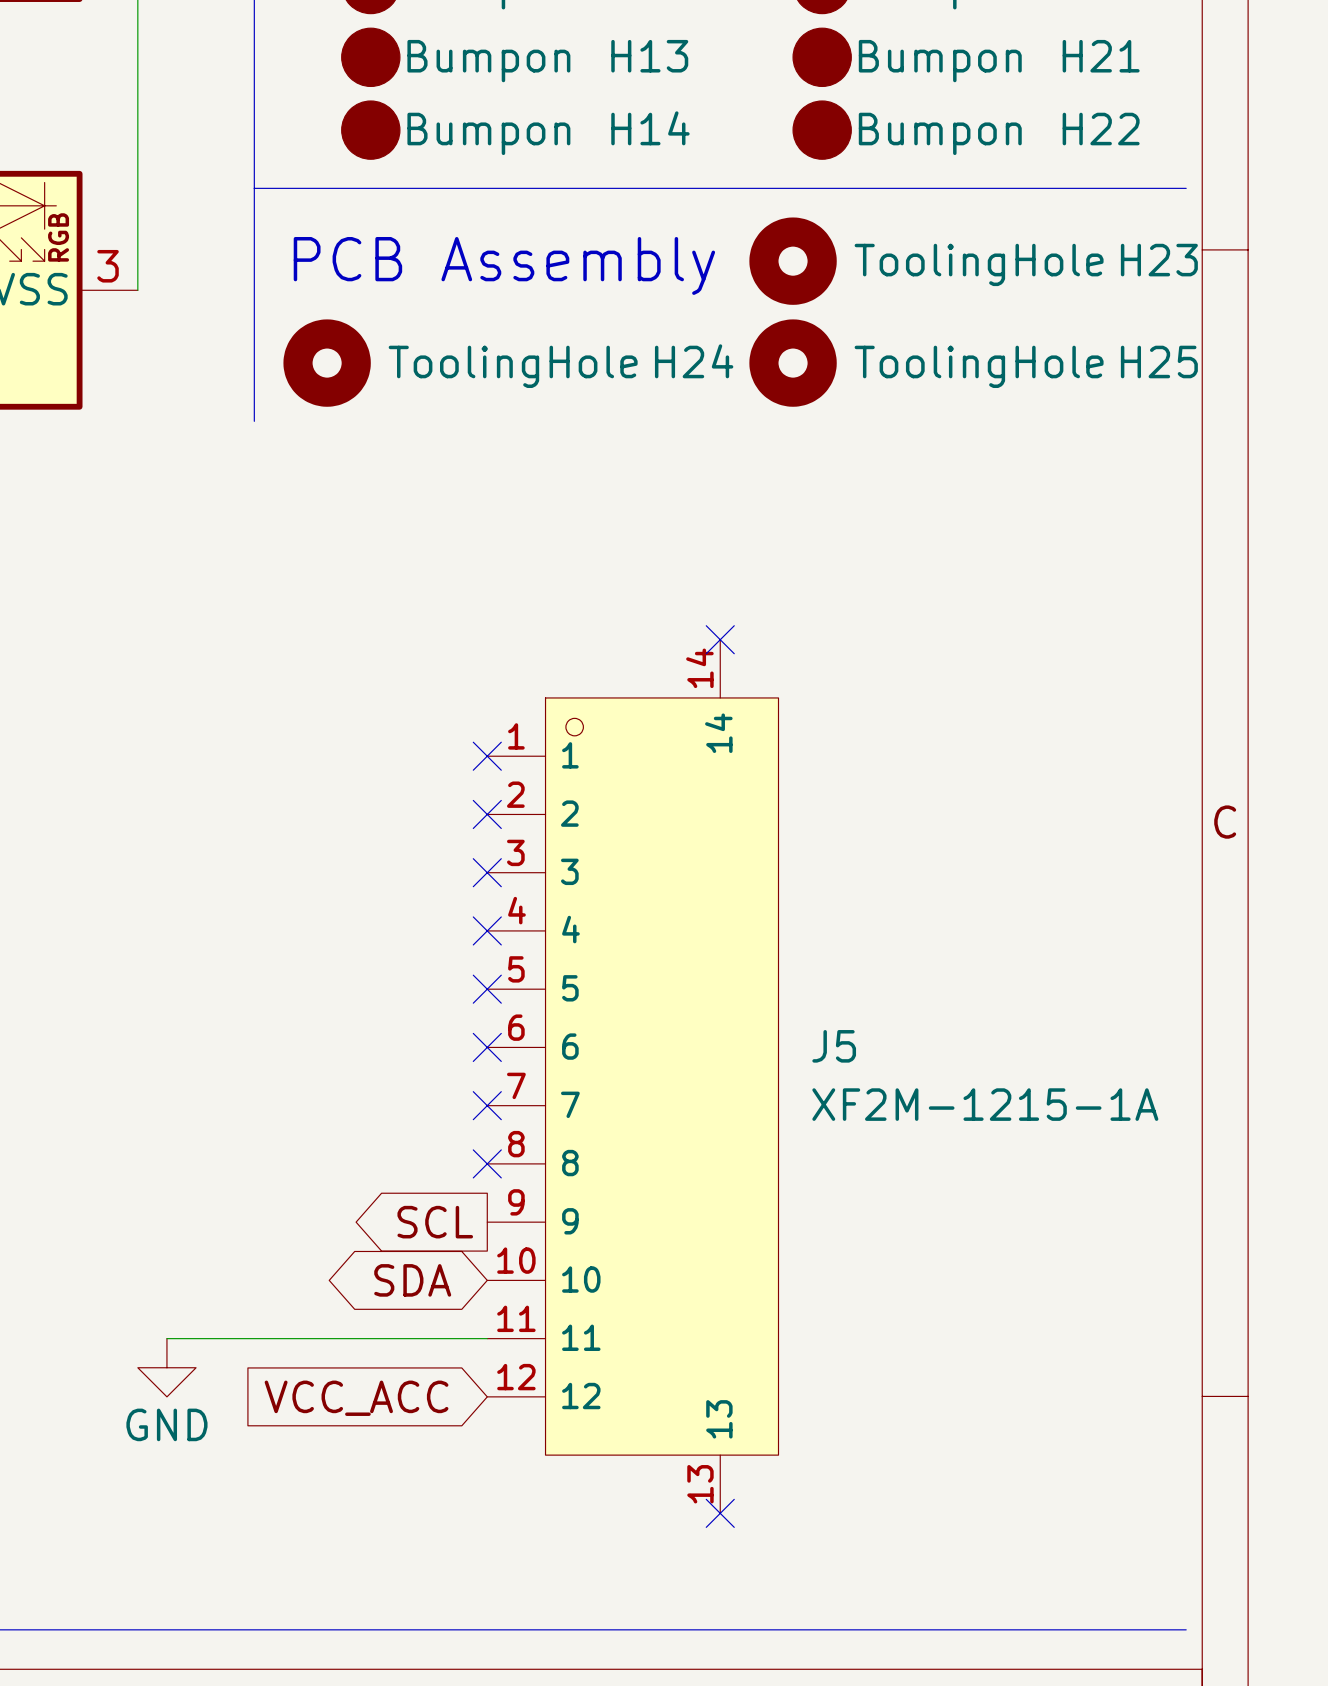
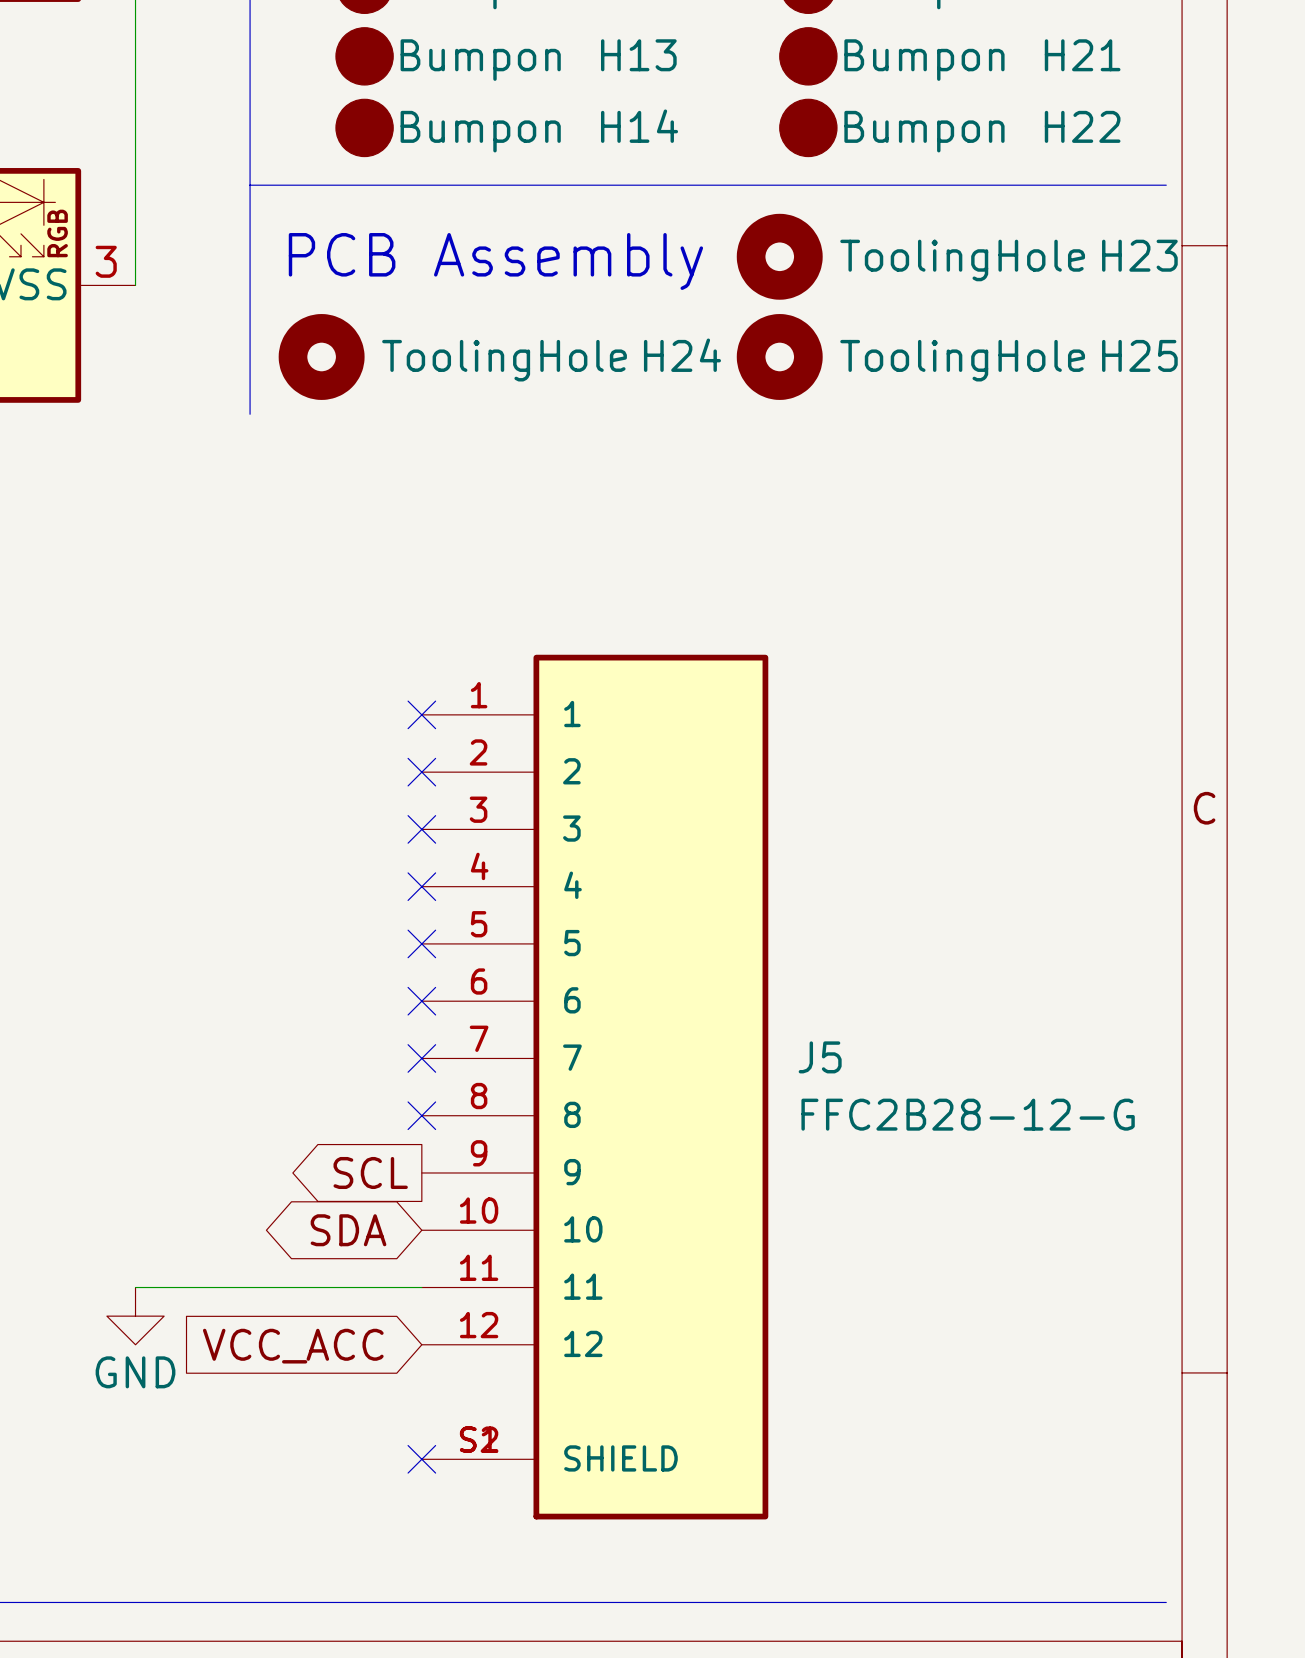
J5 symbol: [487, 639, 779, 1514] -> [421, 654, 769, 1520]
no-connect mark: (720, 639) -> none
no-connect mark: none -> (421, 714)
no-connect mark: (487, 756) -> none
no-connect mark: none -> (421, 772)
no-connect mark: (487, 814) -> none
no-connect mark: none -> (421, 829)
no-connect mark: (487, 872) -> none
no-connect mark: none -> (421, 886)
no-connect mark: (487, 930) -> none
no-connect mark: none -> (421, 943)
no-connect mark: (487, 989) -> none
no-connect mark: none -> (421, 1001)
no-connect mark: (487, 1047) -> none
no-connect mark: none -> (421, 1058)
J5 value: XF2M-1215-1A (985, 1104) -> FFC2B28-12-G (968, 1114)
no-connect mark: (487, 1105) -> none
no-connect mark: none -> (421, 1115)
no-connect mark: (487, 1163) -> none
global label position: SCL (435, 1222) -> SCL (370, 1172)
global label position: SDA (412, 1280) -> SDA (348, 1230)
wire: none -> (135, 1287) (421, 1287)
wire: (166, 1338) (487, 1338) -> none
power symbol position: GND (166, 1367) -> GND (135, 1316)
global label position: VCC_ACC (356, 1398) -> VCC_ACC (293, 1346)
no-connect mark: none -> (421, 1459)
no-connect mark: (720, 1513) -> none

